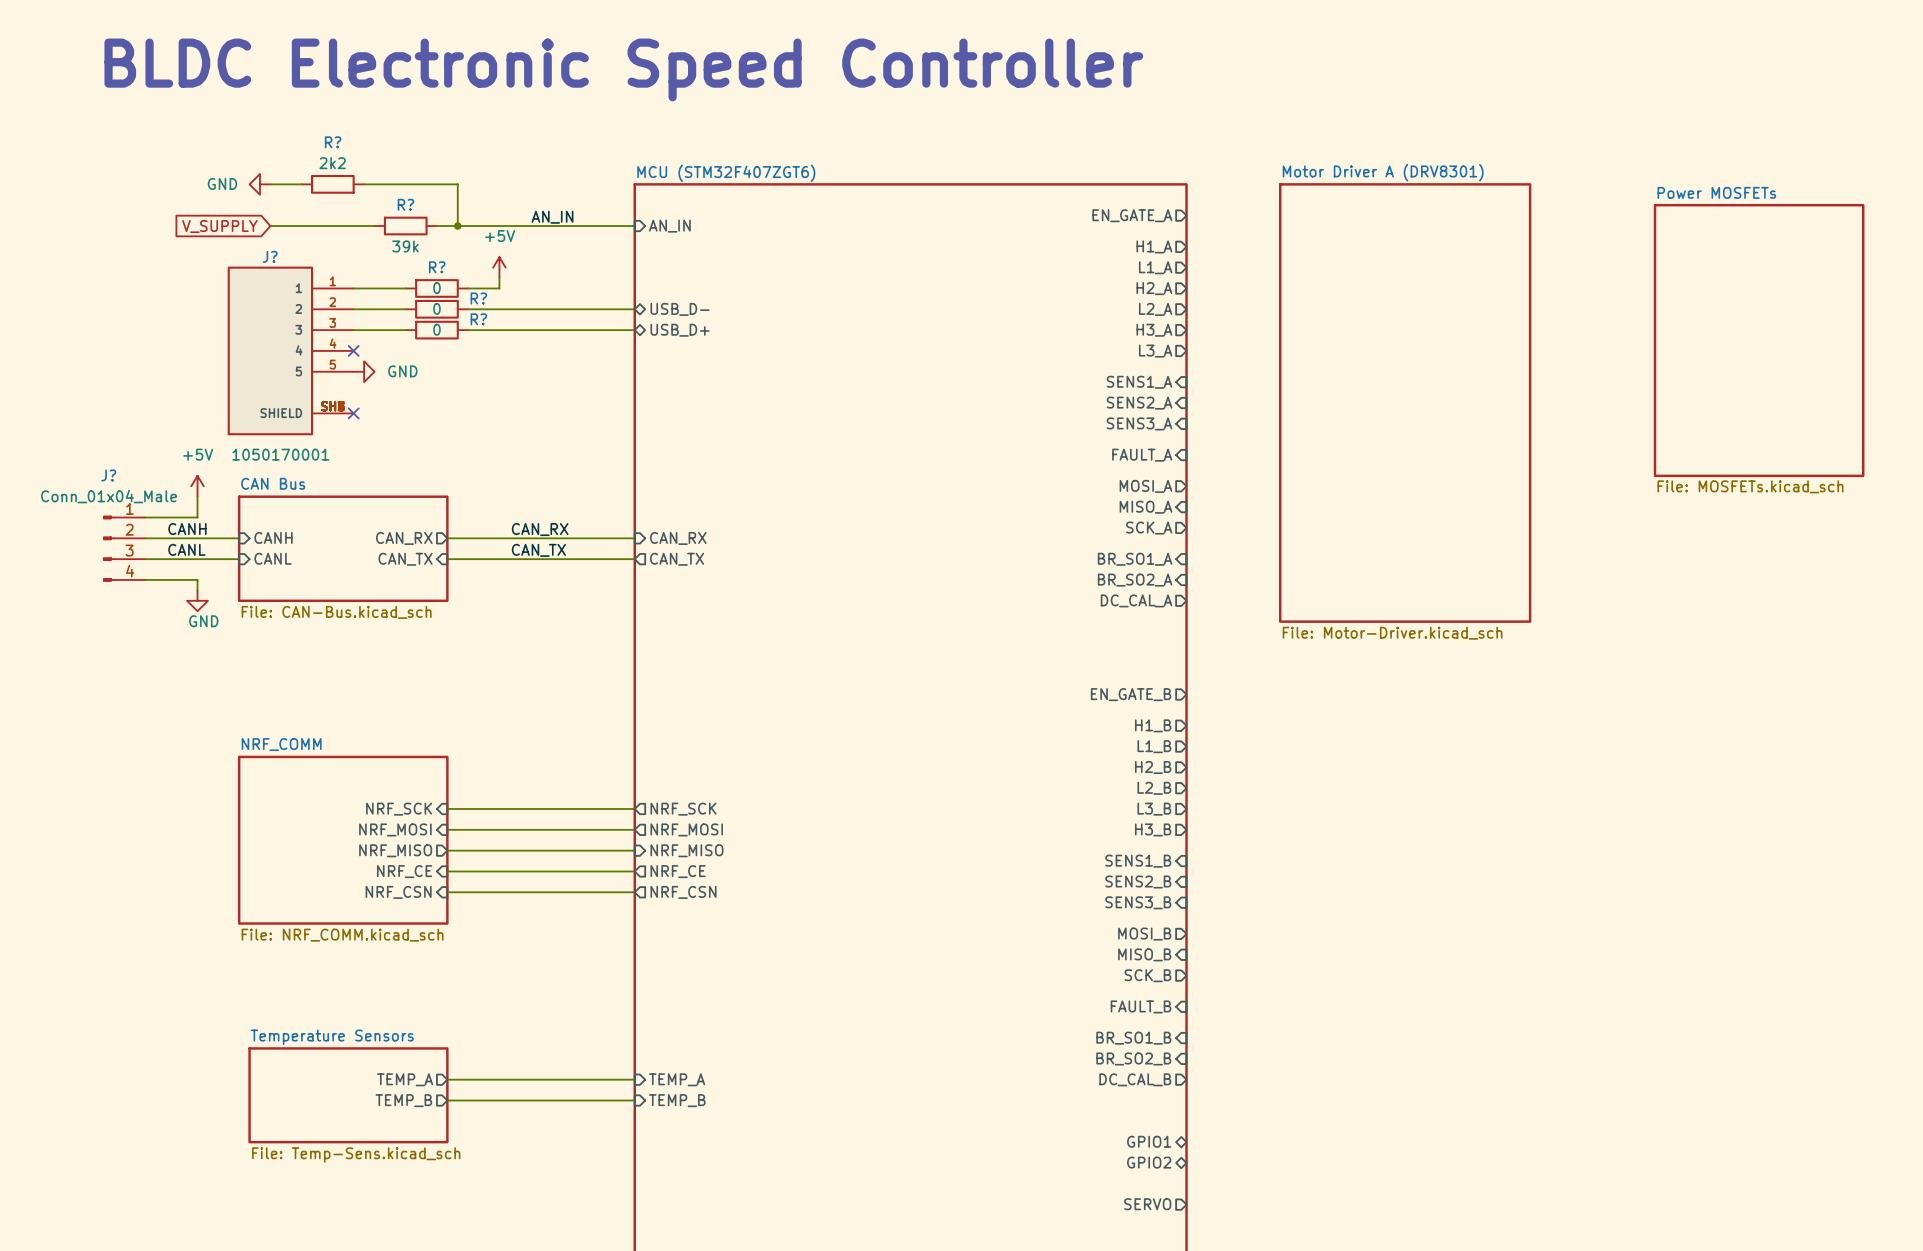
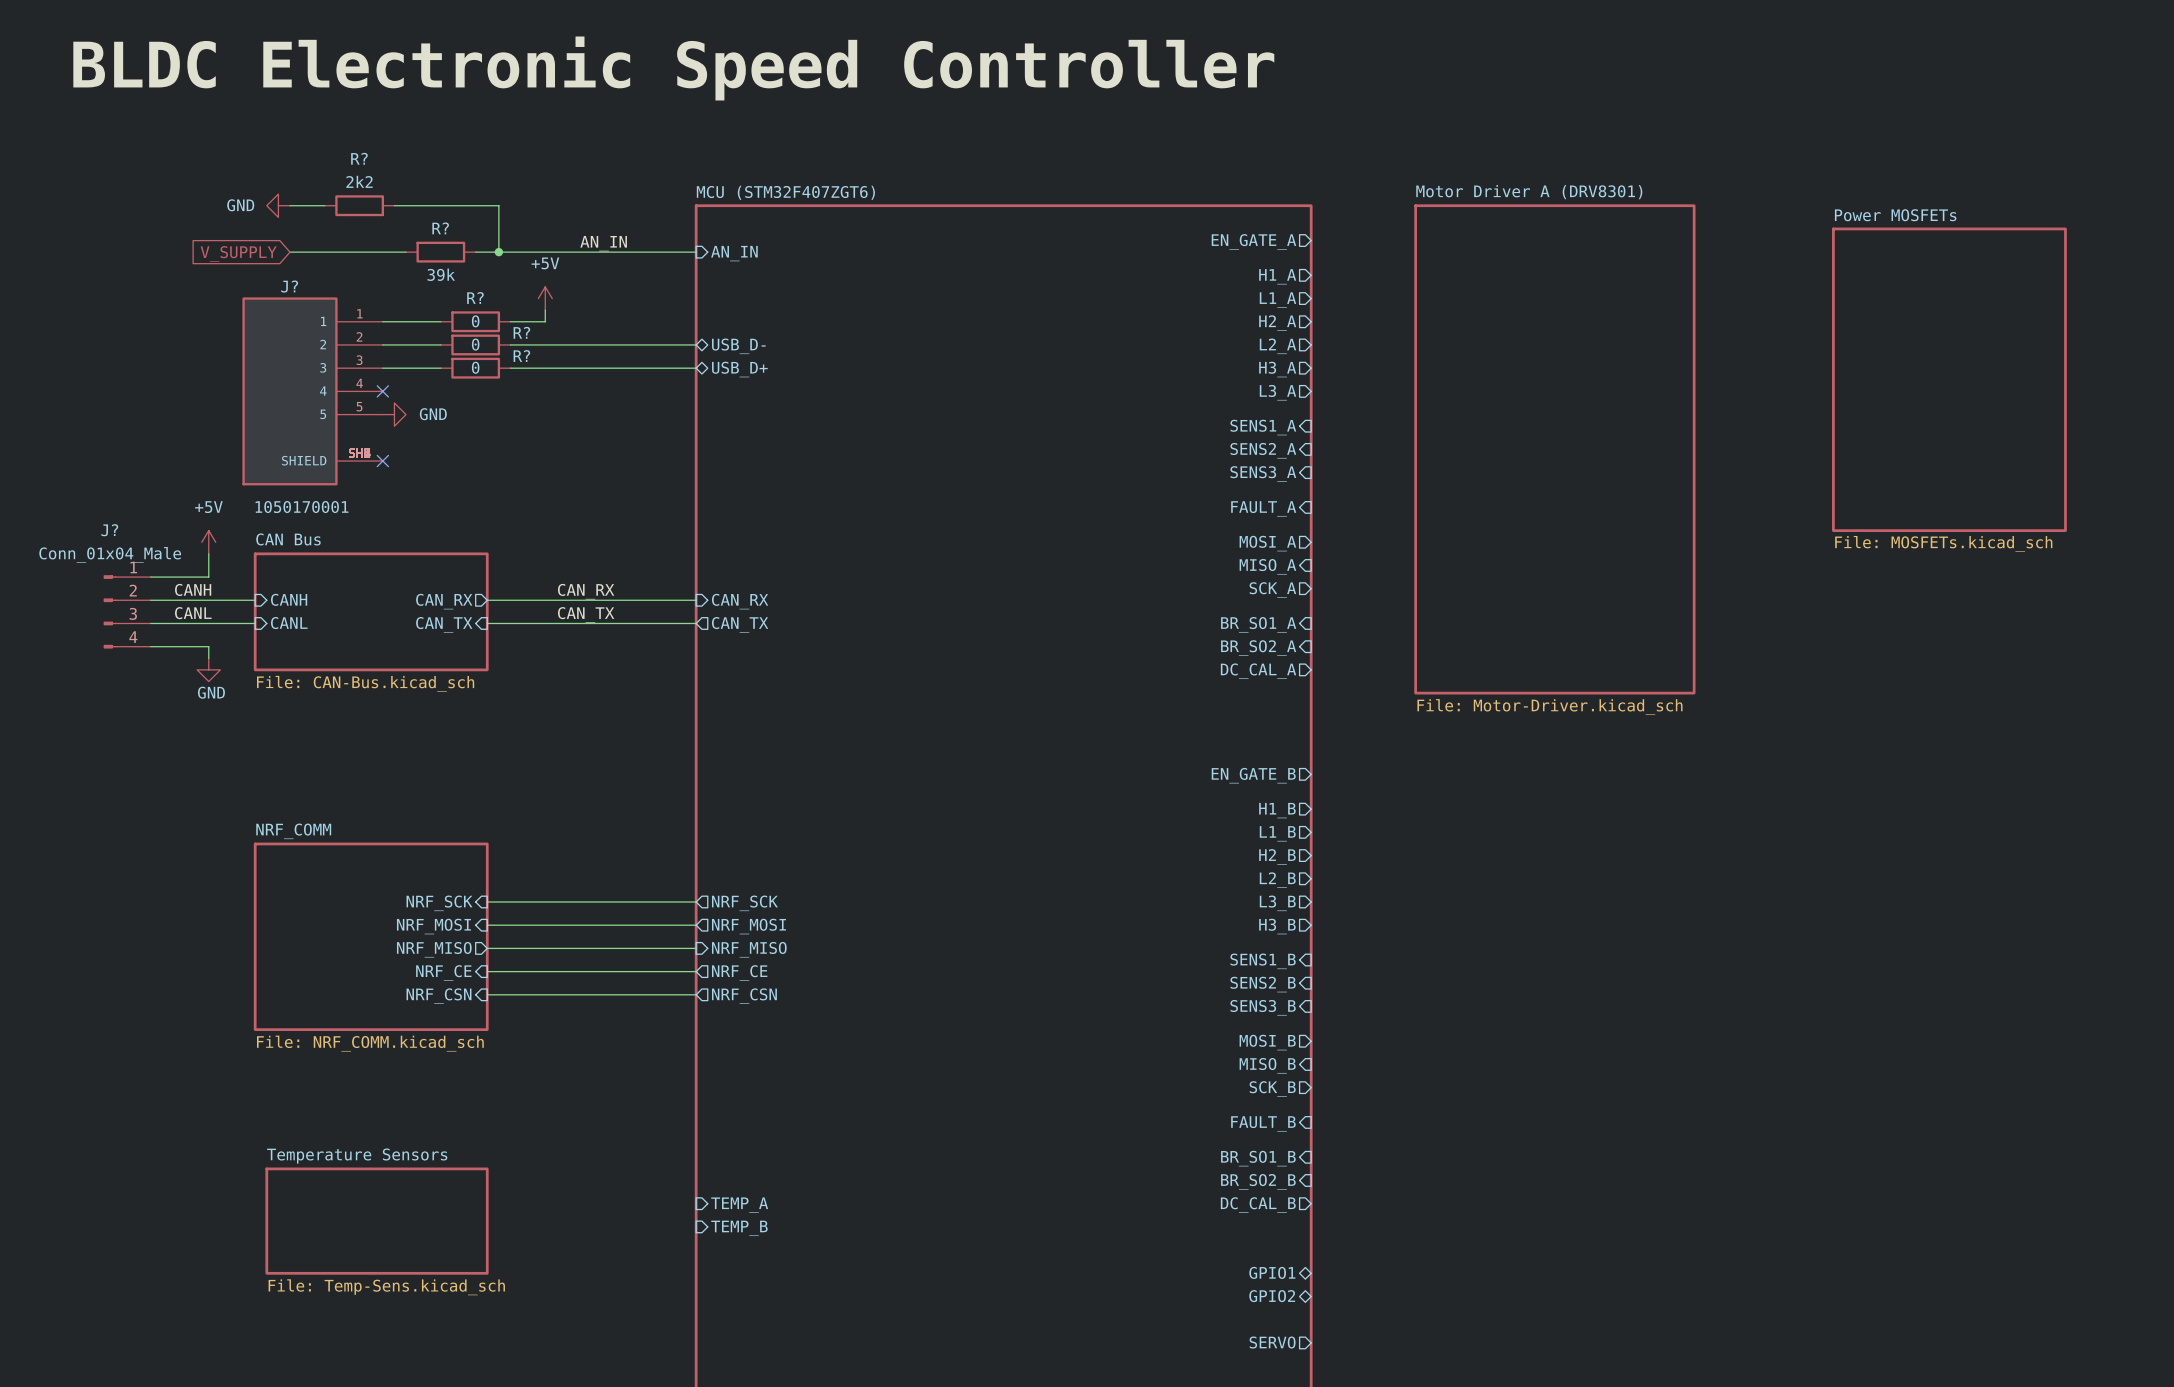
label: none -> BLDC Electronic Speed Controller (673, 68)
text: BLDC Electronic Speed Controller (623, 69) -> none
sheet pin: TEMP_A (405, 1079) -> none
wire: (447, 1079) (634, 1079) -> none
sheet pin: TEMP_B (403, 1100) -> none
wire: (447, 1100) (634, 1100) -> none

